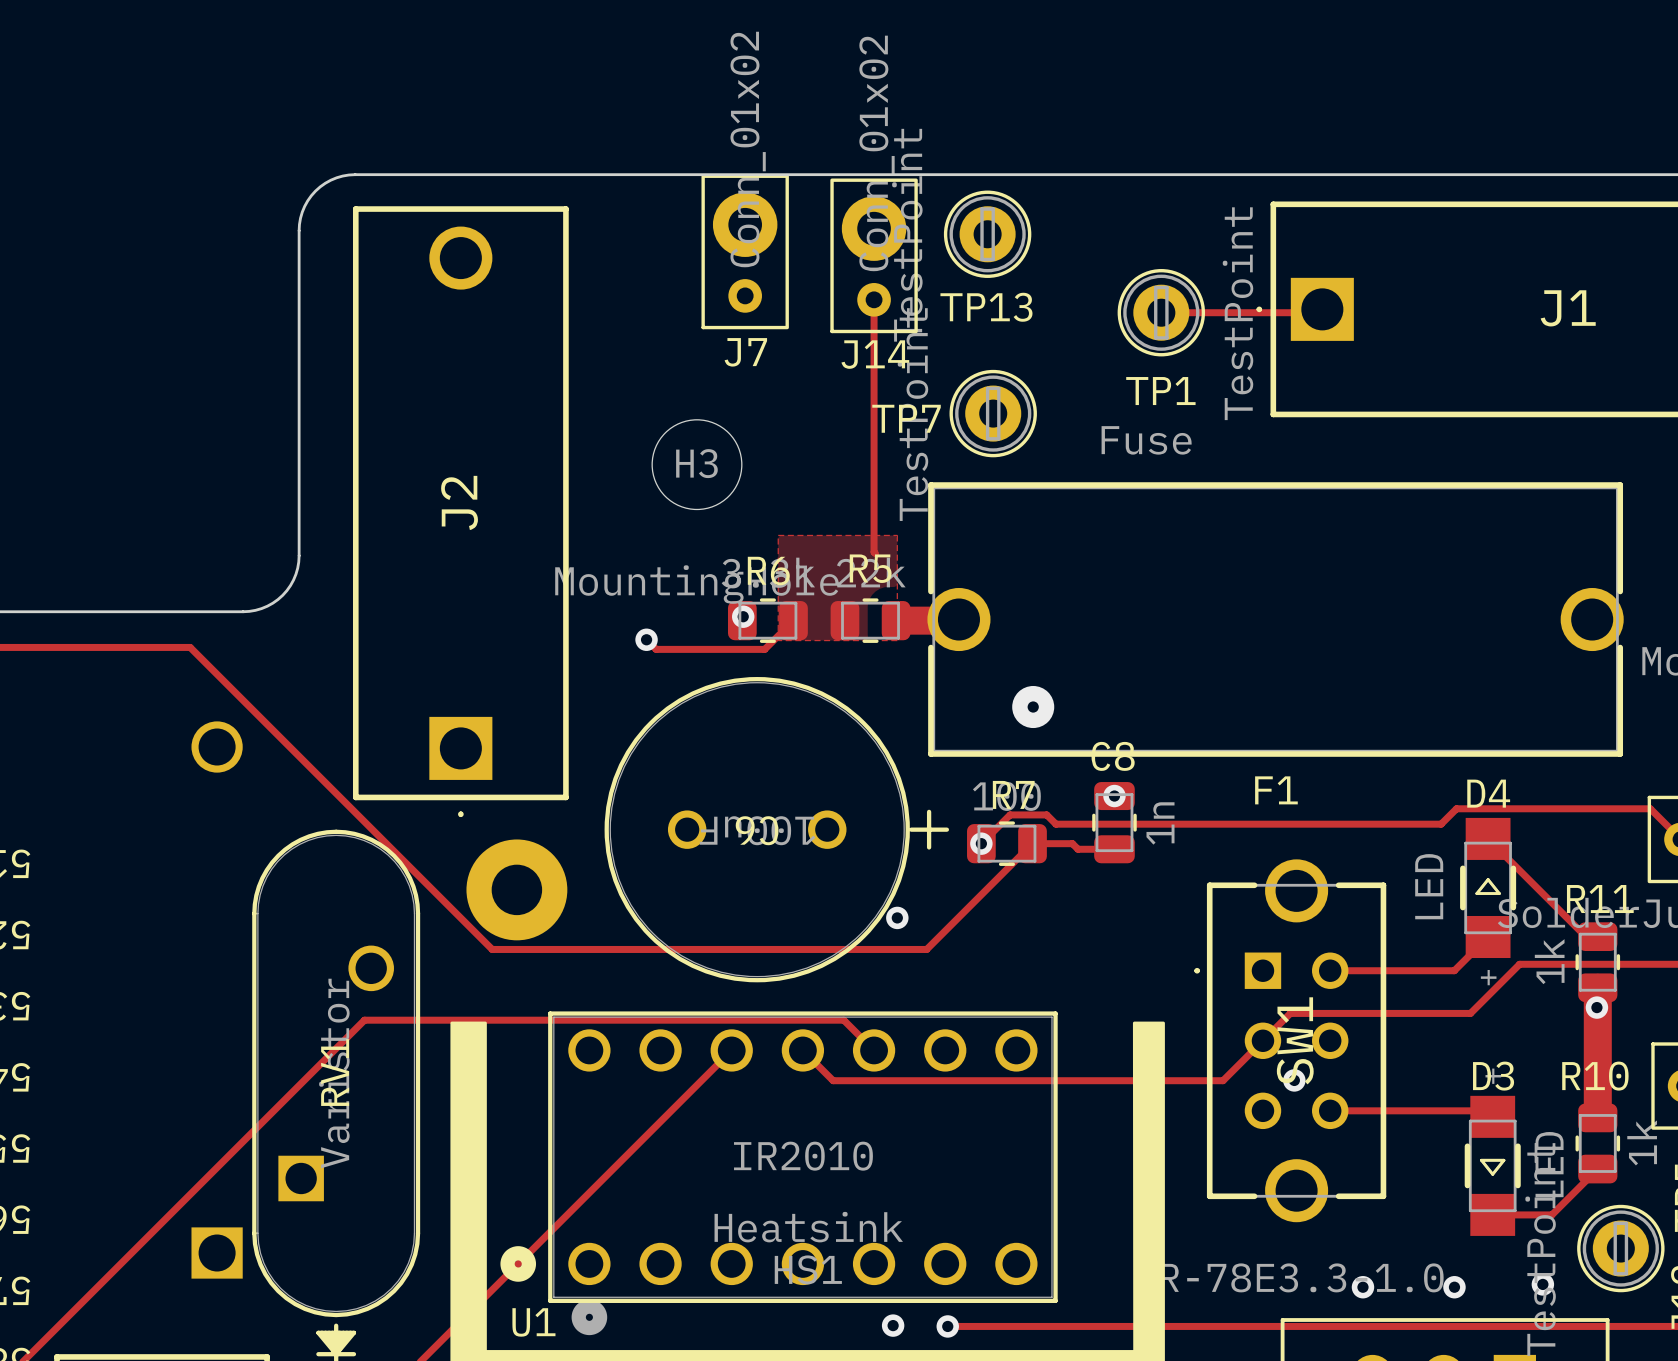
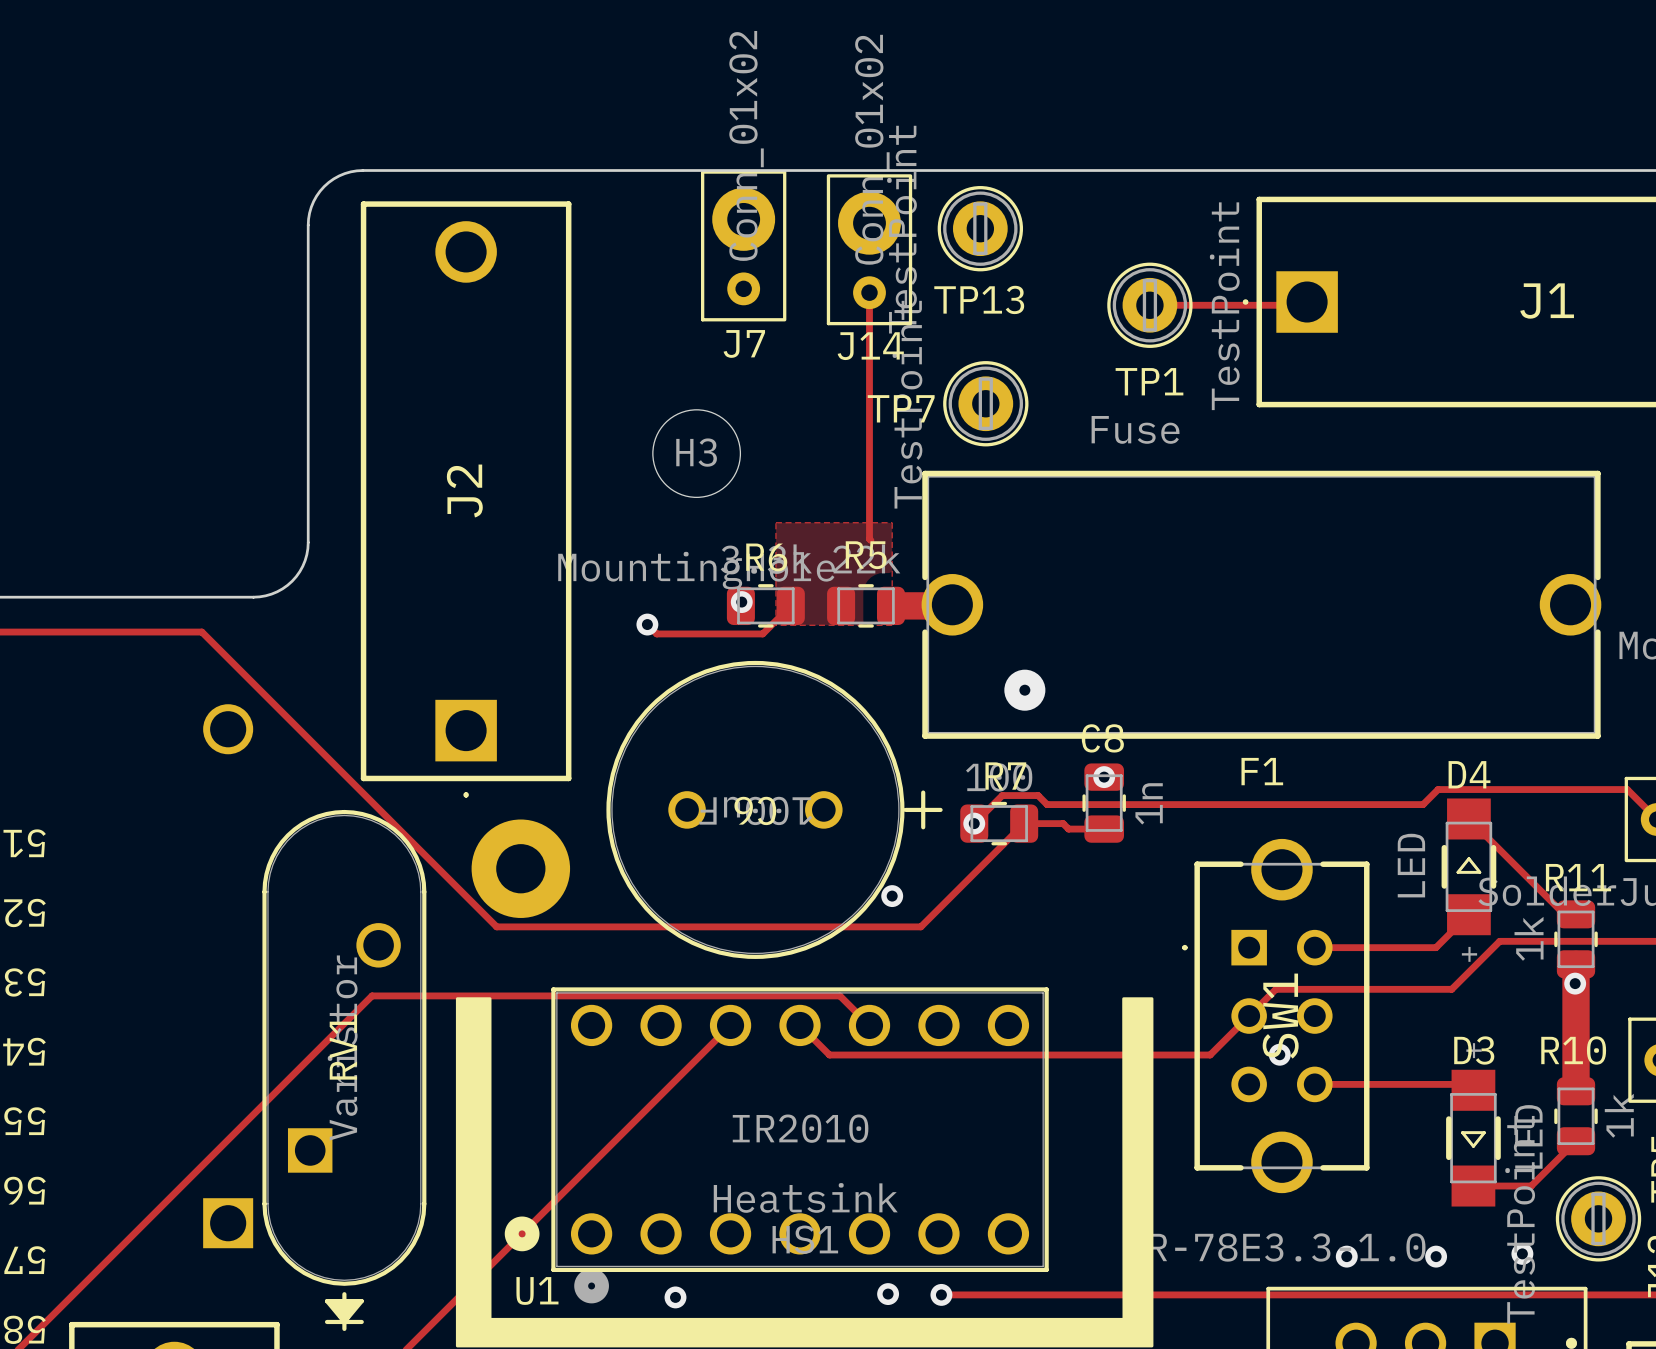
via: none -> (675, 1297)

